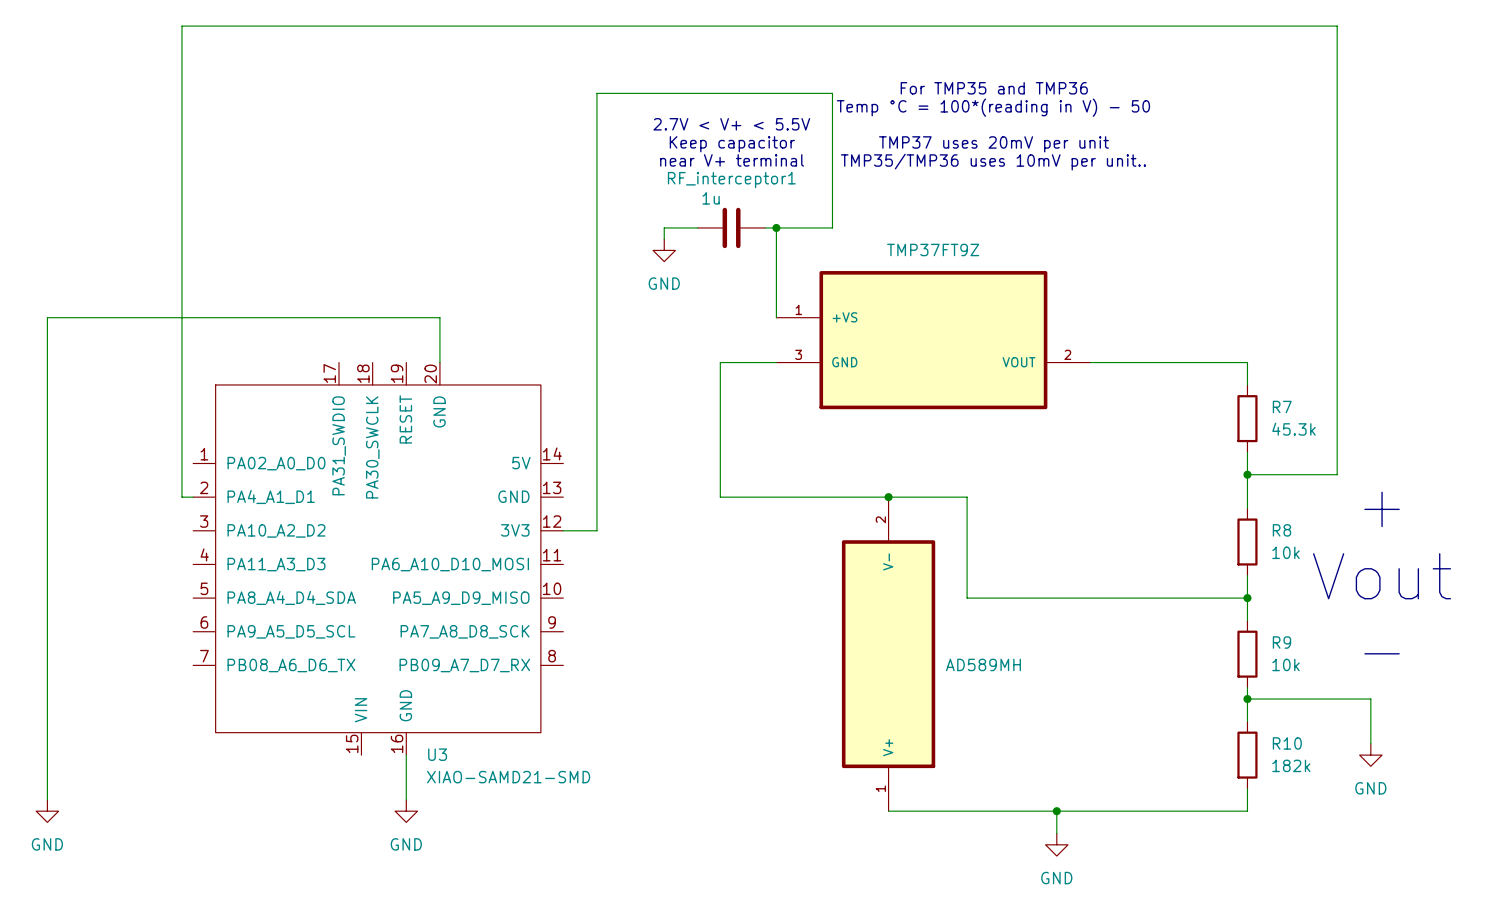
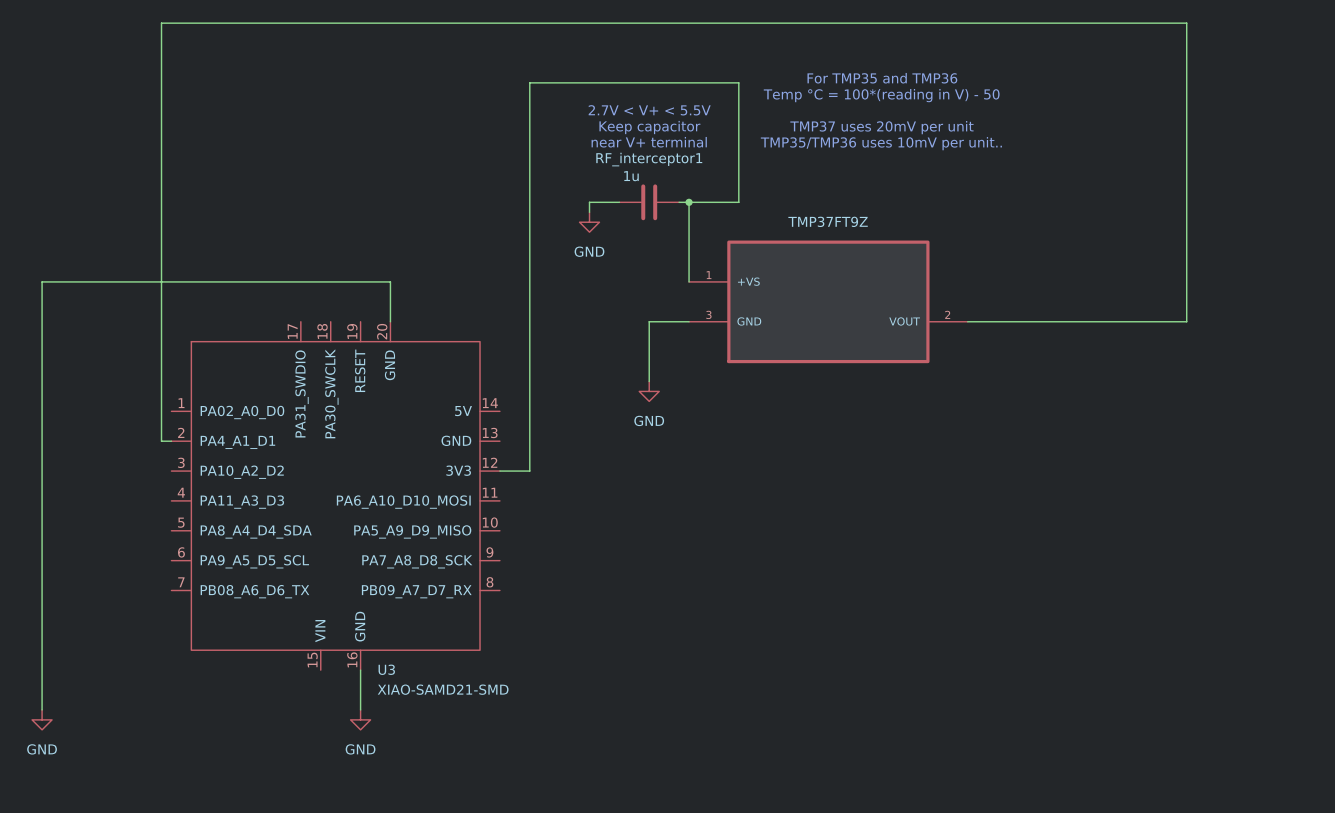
wire: (731, 362) (720, 362) (720, 497) (967, 497) (967, 598) (1247, 598) -> (649, 321) (649, 381)
wire: (1247, 362) (1247, 384) -> (1107, 321) (1186, 321)
wire: (1337, 362) (1337, 474) (1247, 474) -> none
R7: 45.3k (1247, 418) -> none
power symbol: none -> GND (649, 391)
wire: (1247, 452) (1247, 508) -> none
junction: (1247, 474) -> none
junction: (888, 497) -> none
text: + (1382, 509) -> none
R8: 10k (1247, 542) -> none
wire: (1247, 575) (1247, 620) -> none
text: Vout (1382, 576) -> none
junction: (1247, 598) -> none
text: - (1382, 653) -> none
part: AD589MH (888, 654) -> none
R9: 10k (1247, 654) -> none
wire: (1247, 687) (1247, 721) -> none
wire: (1247, 699) (1370, 699) (1370, 743) -> none
junction: (1247, 699) -> none
R10: 182k (1247, 755) -> none
power symbol: GND (1370, 755) -> none
wire: (1247, 788) (1247, 811) (888, 811) -> none
wire: (1056, 811) (1056, 833) -> none
junction: (1056, 811) -> none
power symbol: GND (1056, 844) -> none

